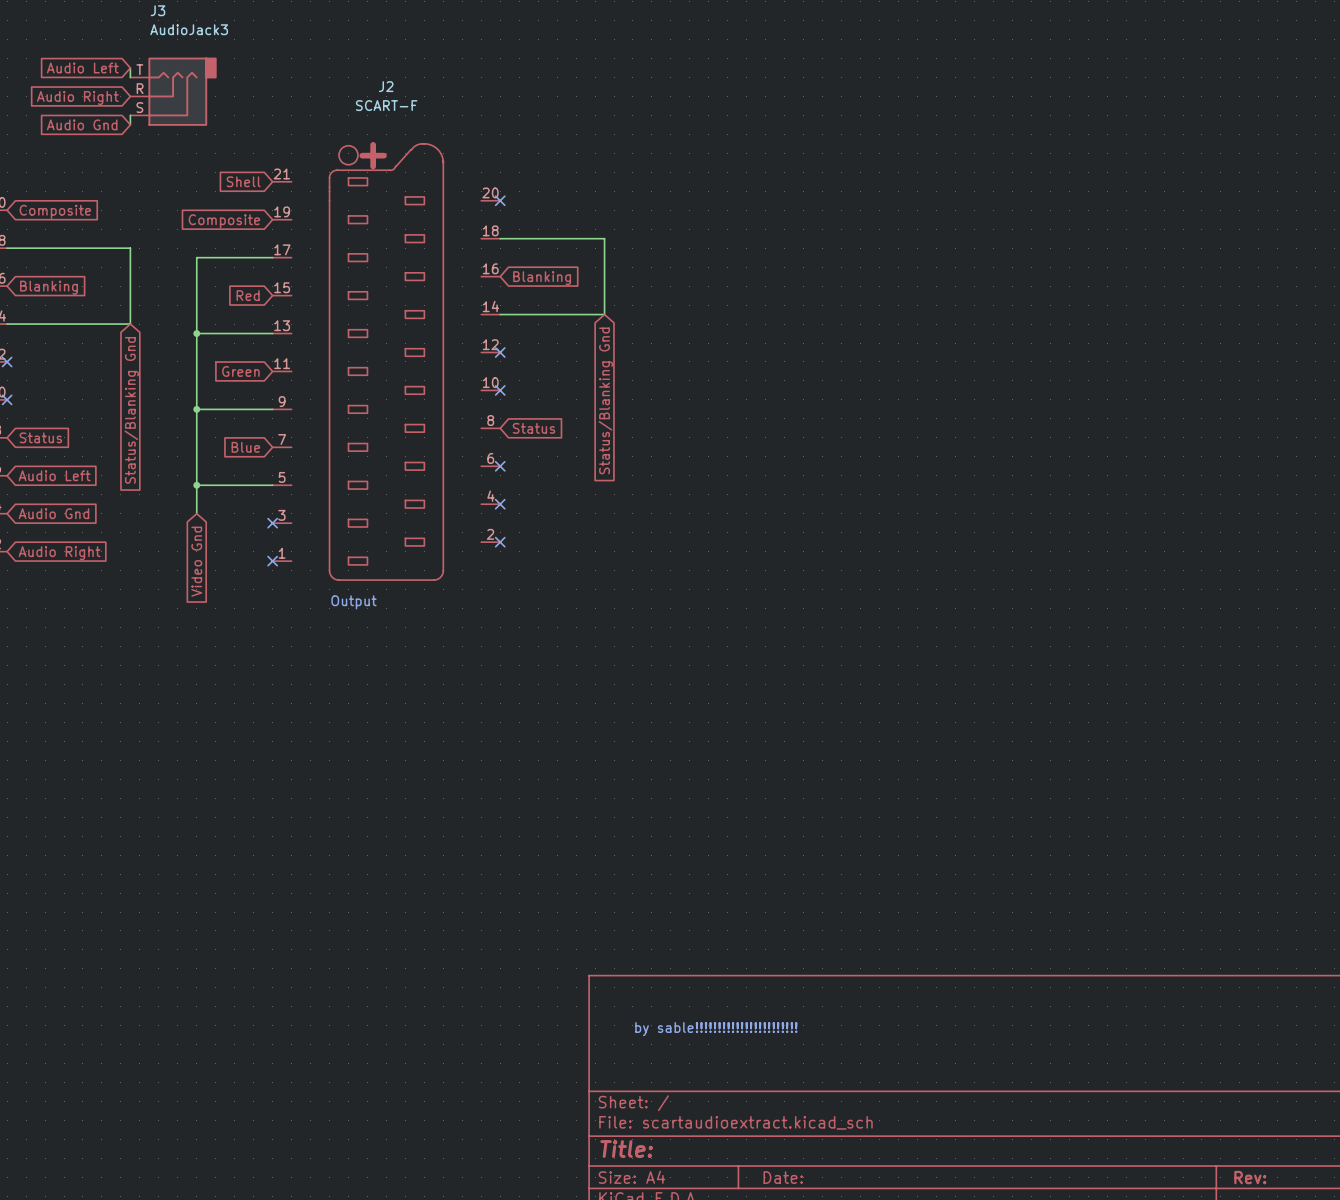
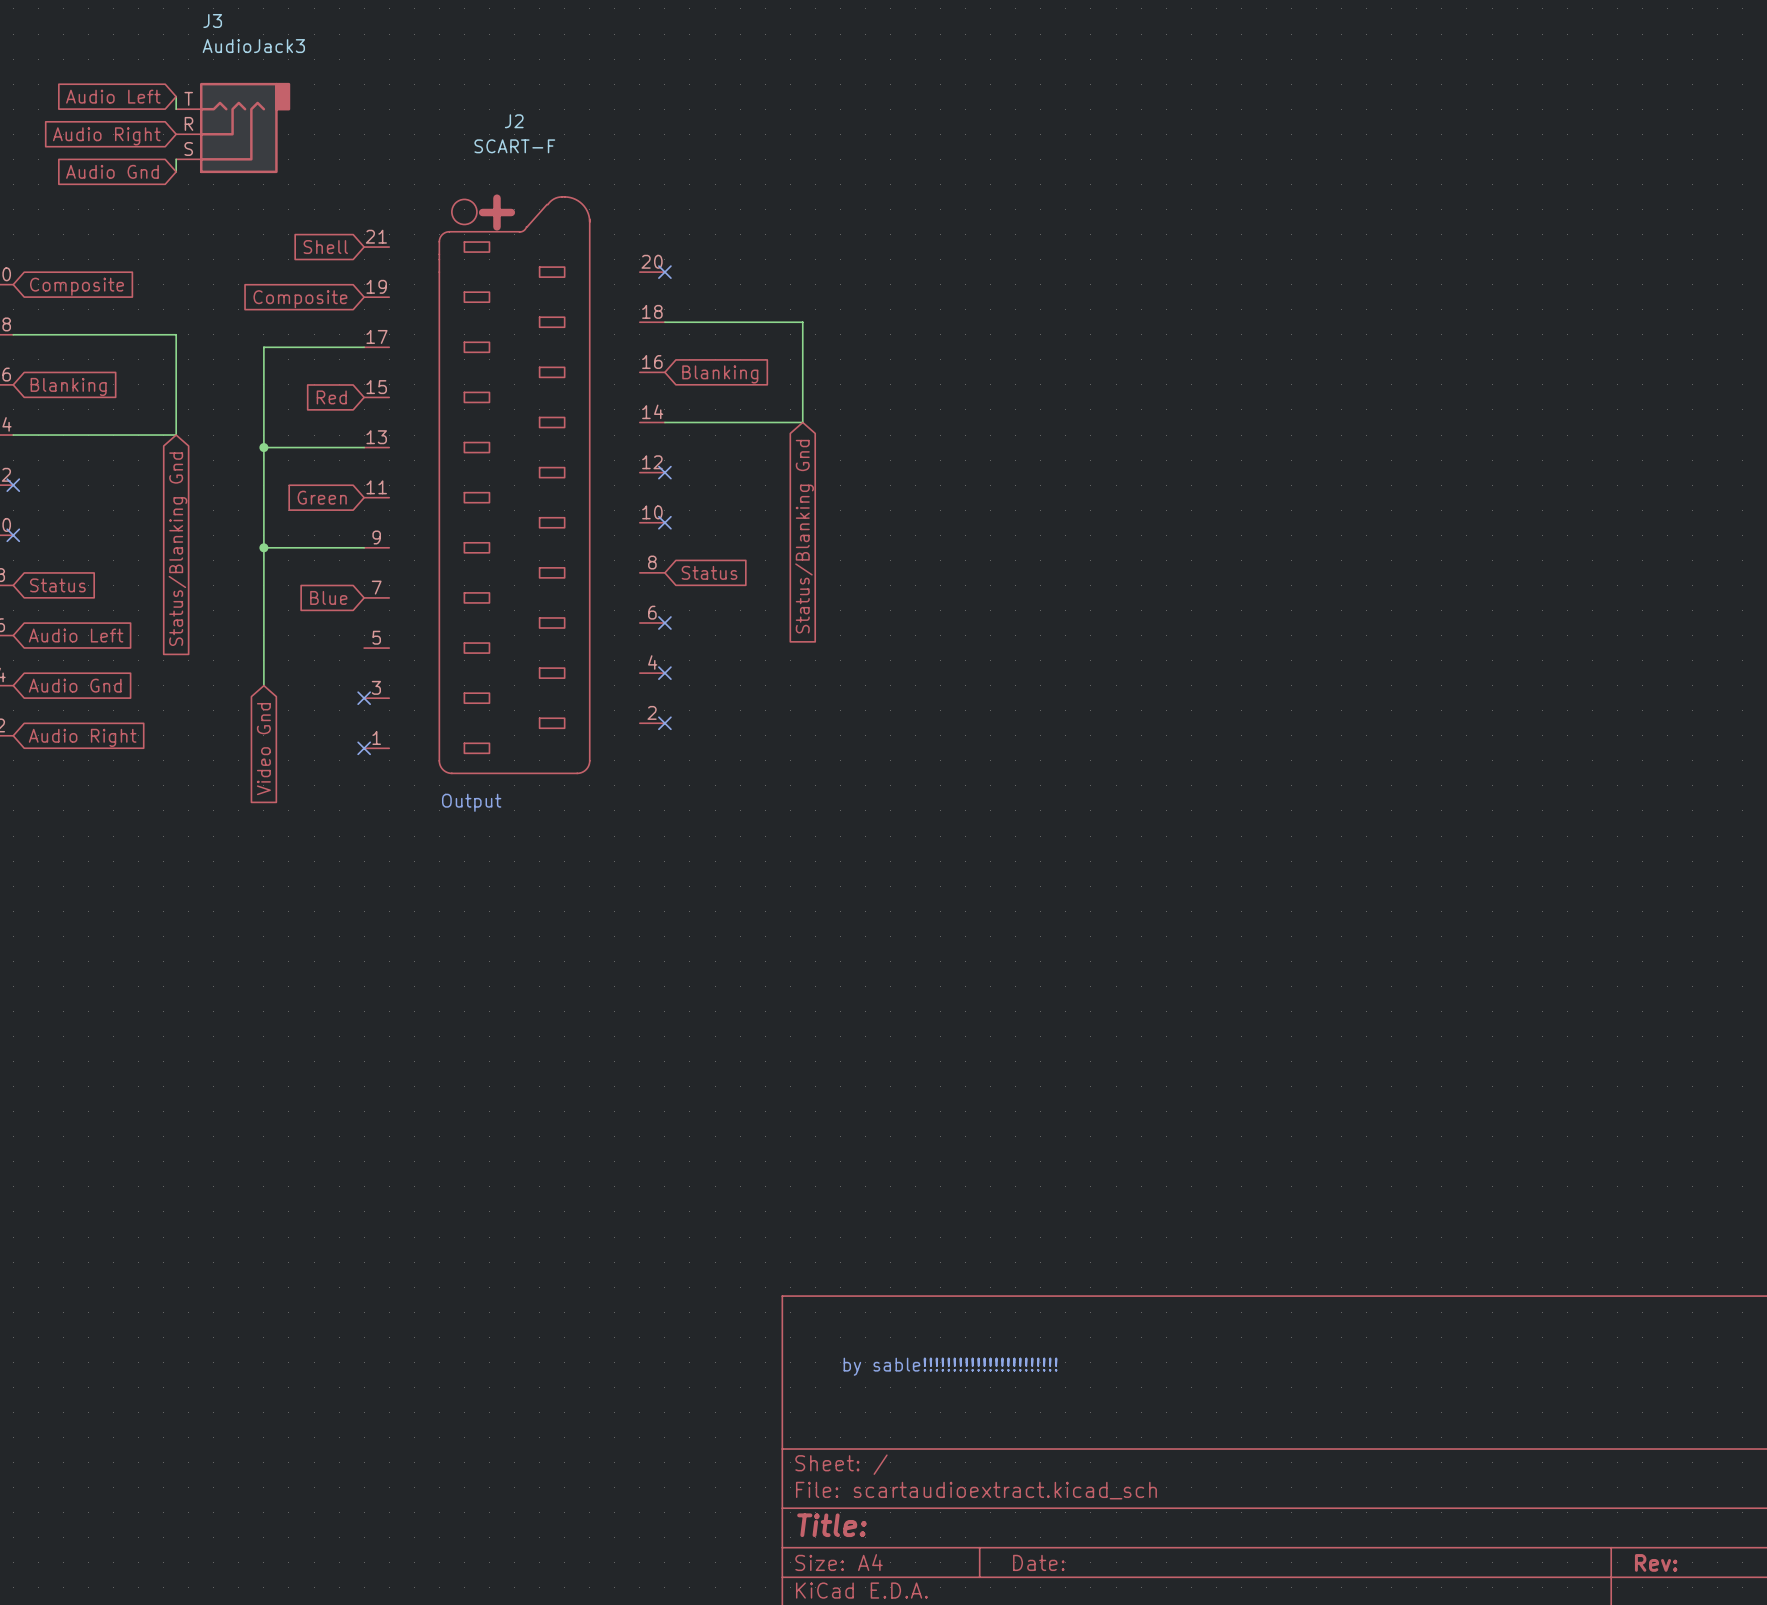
wire: (196, 485) (272, 485) -> none
junction: (196, 485) -> none

